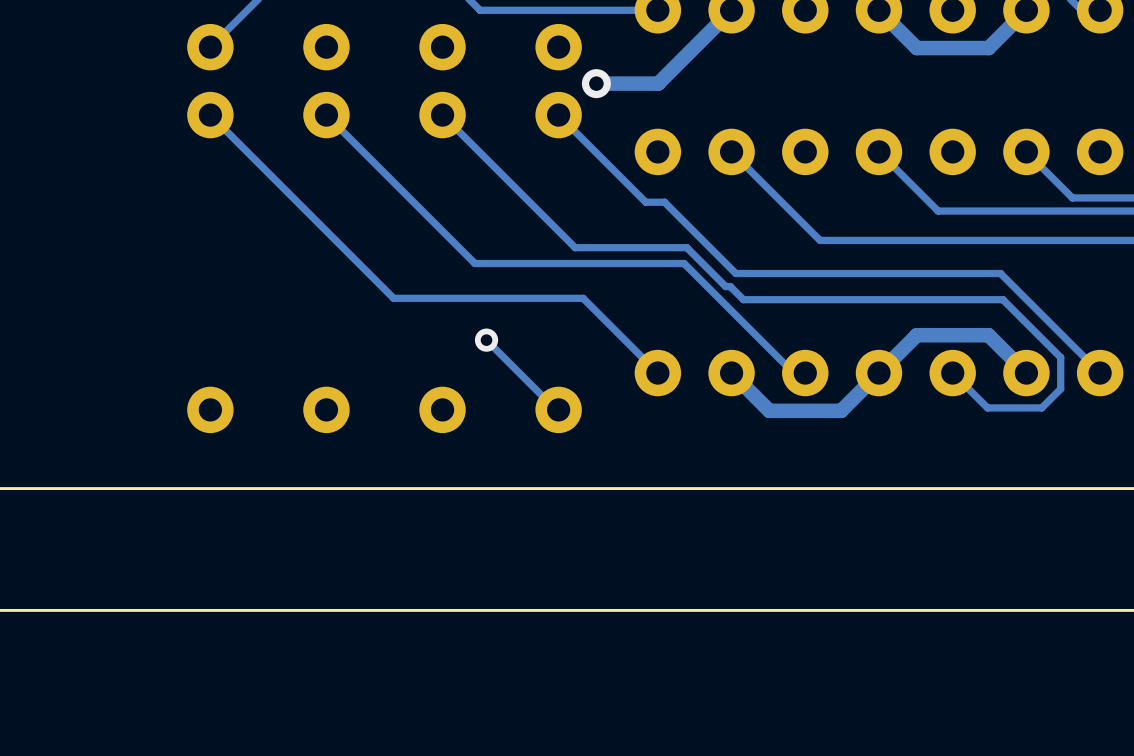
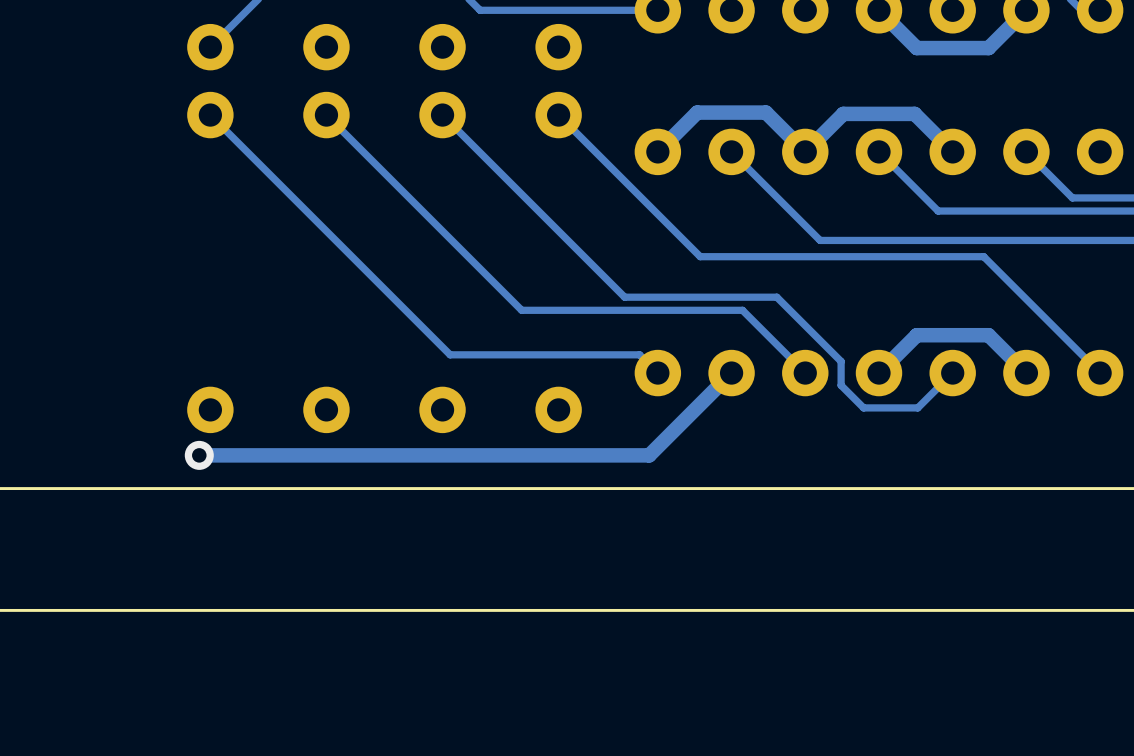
track: (731, 10) (658, 83) (596, 83) -> none
via: (596, 83) -> none
track: none -> (952, 151) (914, 113) (843, 113) (805, 151) (765, 112) (697, 112) (657, 151)
track: (645, 202) (664, 202) (735, 273) (1000, 273) -> (645, 202) (700, 256) (983, 256) (1000, 273)
track: (575, 247) (686, 247) (725, 286) (730, 286) (743, 299) (1002, 299) (1060, 357) (1060, 388) (1041, 407) (987, 407) (952, 373) -> (575, 247) (624, 297) (776, 297) (841, 361) (841, 385) (863, 407) (917, 407) (952, 373)
track: (474, 263) (684, 263) (793, 373) (805, 373) -> (474, 263) (521, 310) (742, 310) (805, 373)
track: (393, 298) (583, 298) (639, 354) -> (393, 298) (450, 354) (639, 354)
track: (486, 340) (556, 409) (558, 409) -> none
via: (486, 340) -> none
track: (878, 373) (841, 410) (769, 410) (731, 373) -> (199, 455) (649, 455) (731, 373)
via: none -> (199, 455)

